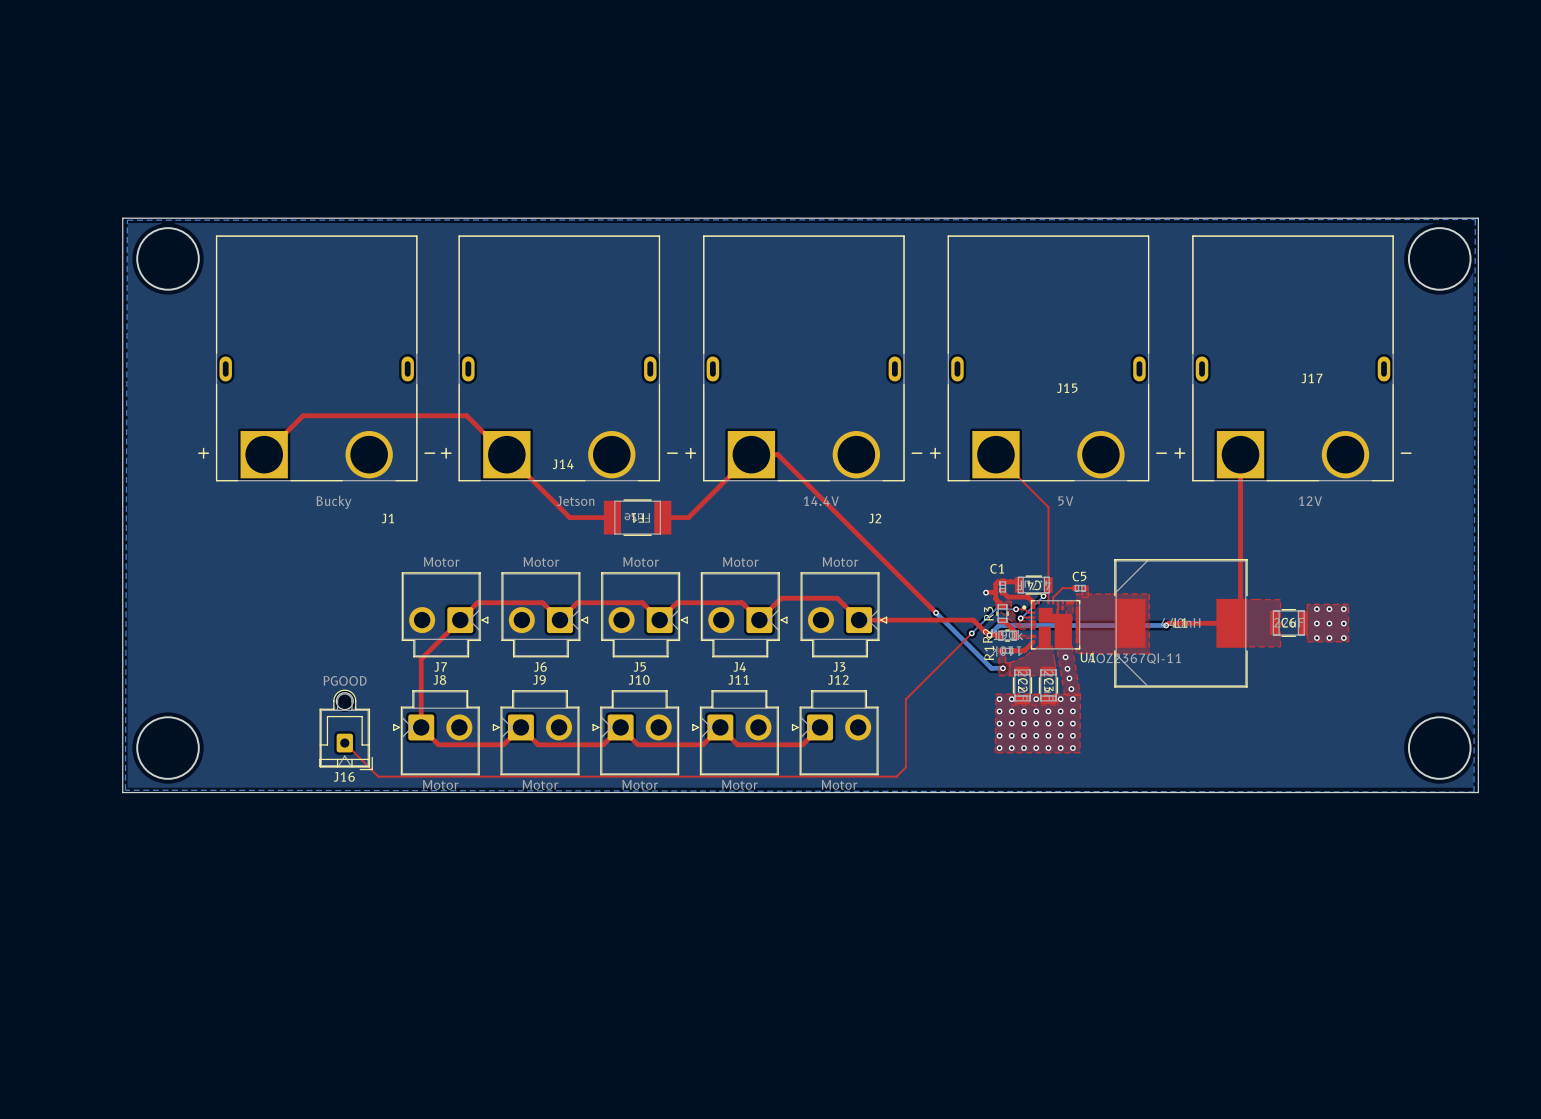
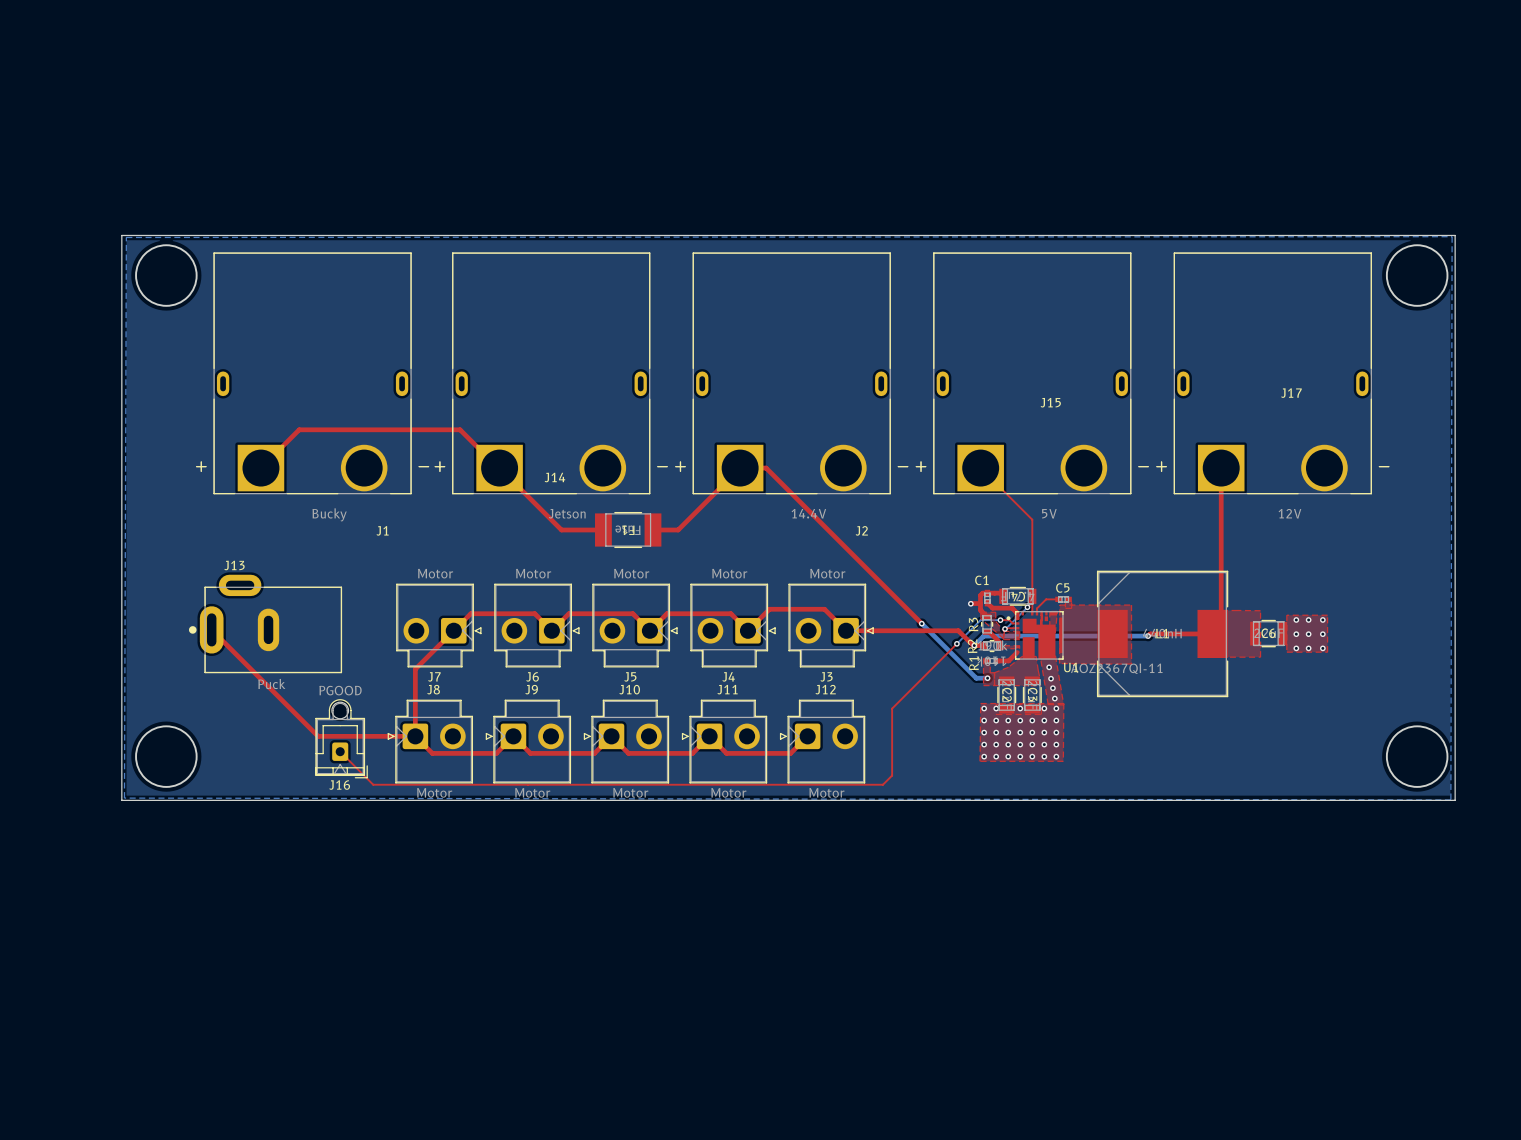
J13: none -> Puck (265, 623)
top track: none -> (211, 641) (211, 629) (318, 736) (415, 736)

